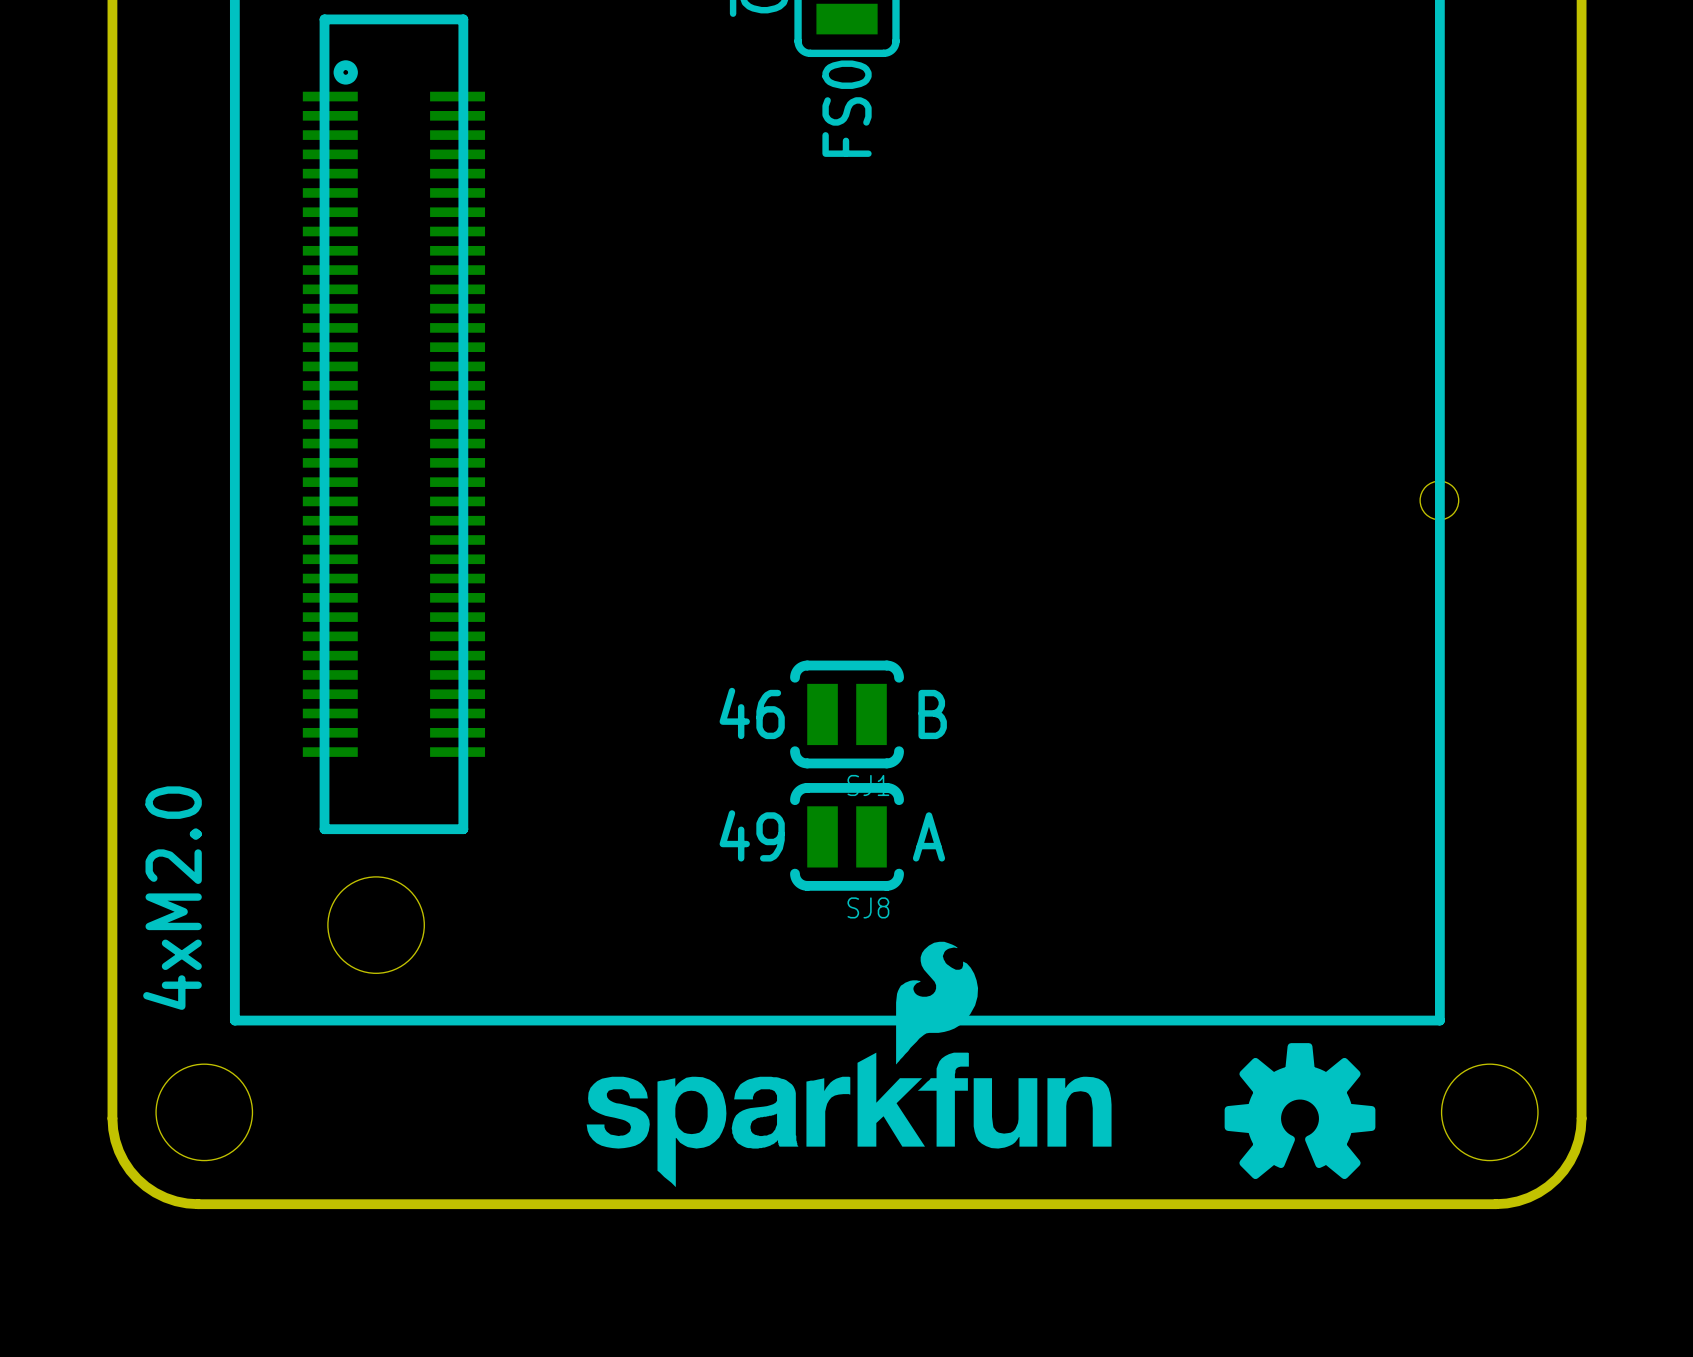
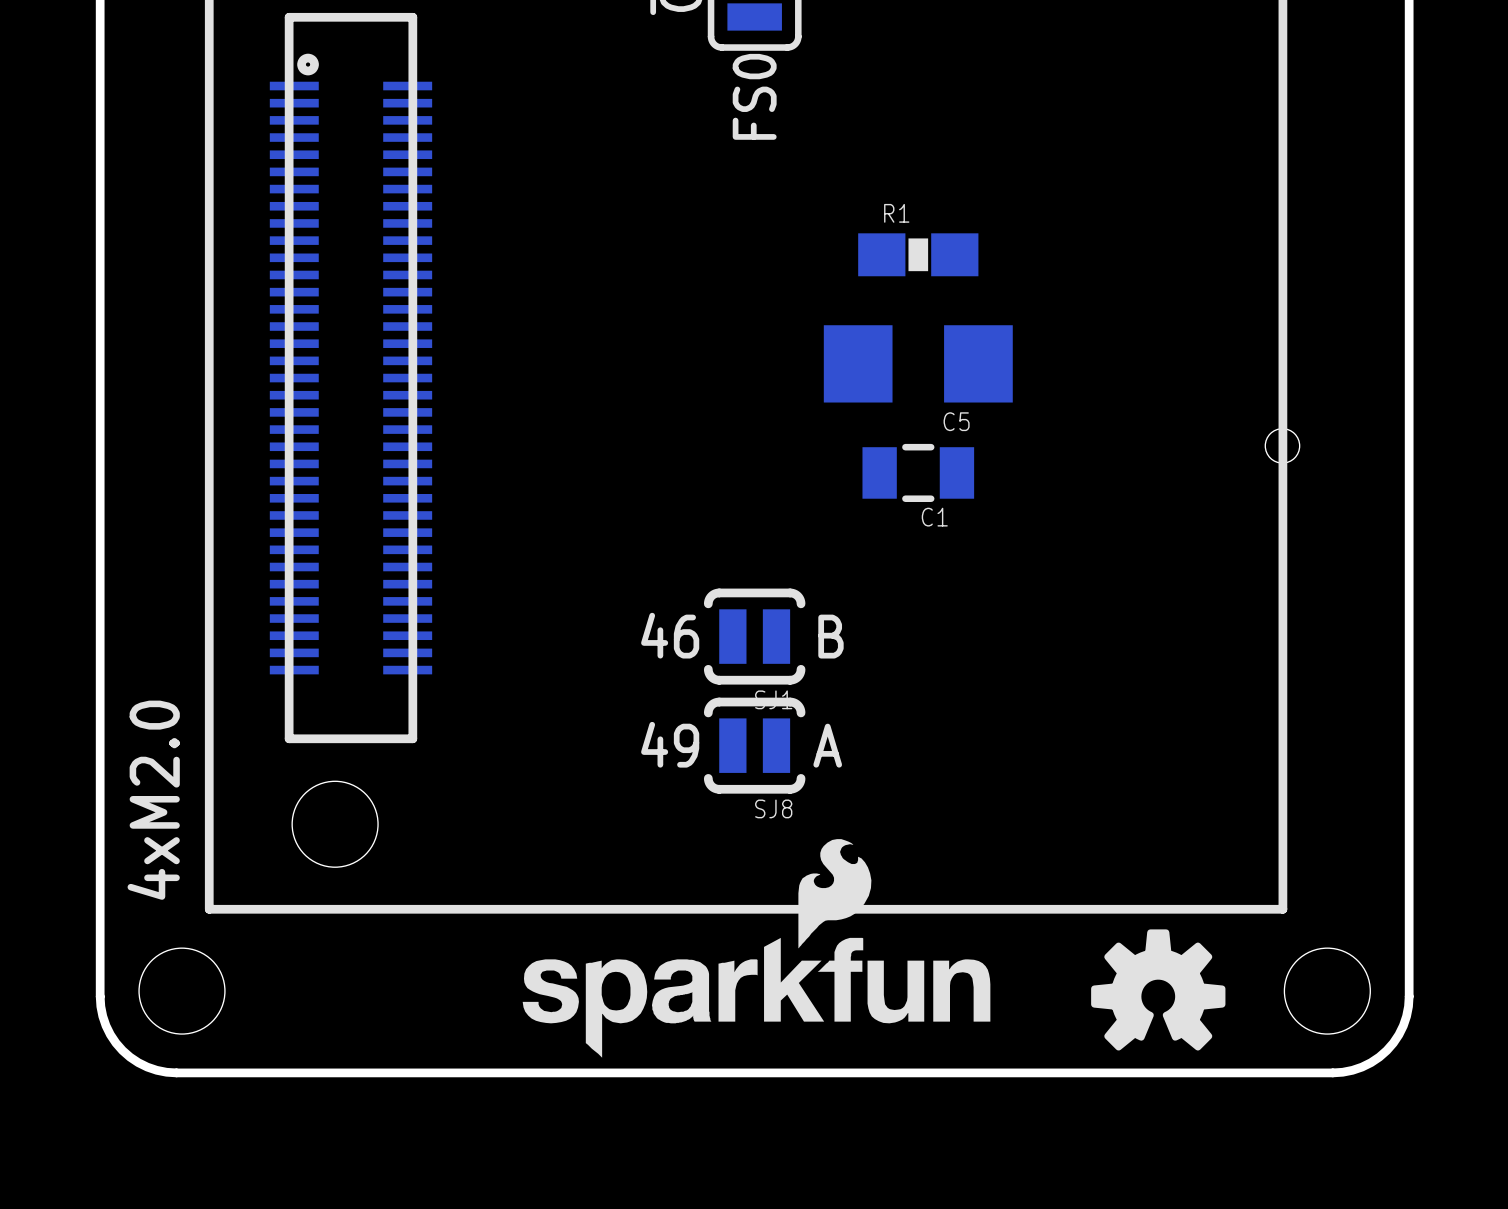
R1: none -> (918, 254)
C5: none -> (918, 363)
C1: none -> (918, 472)

